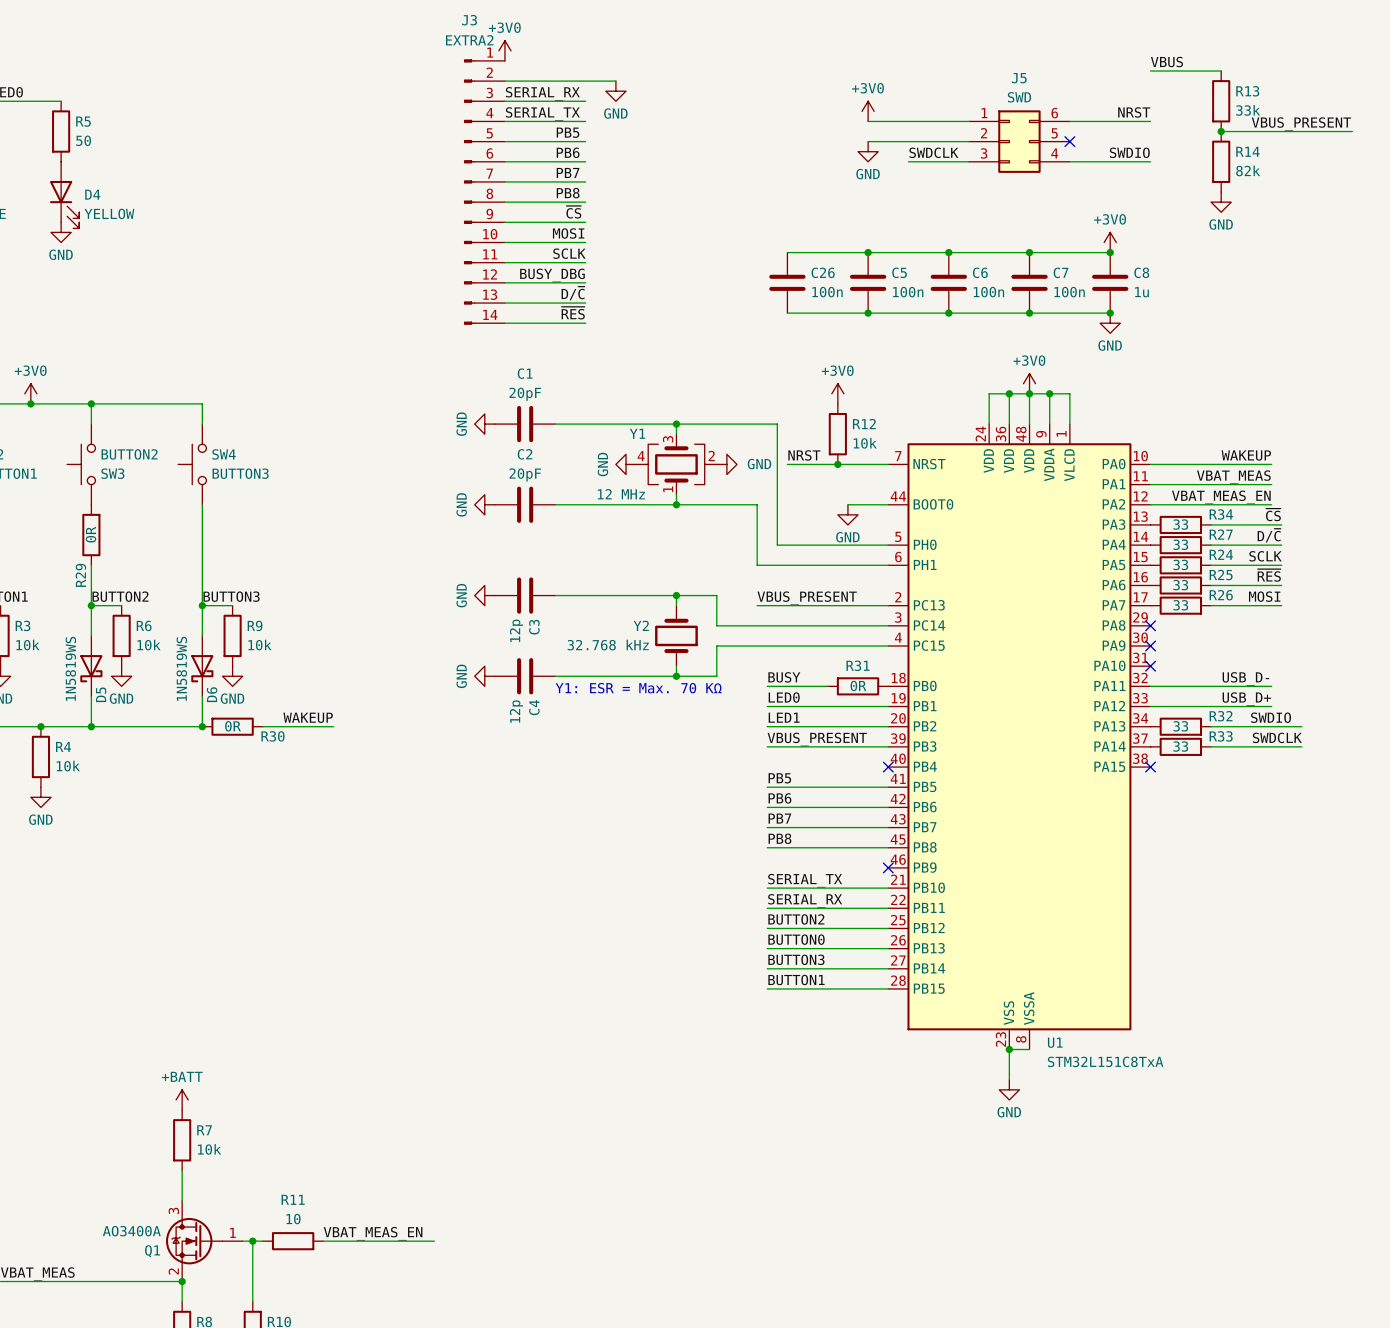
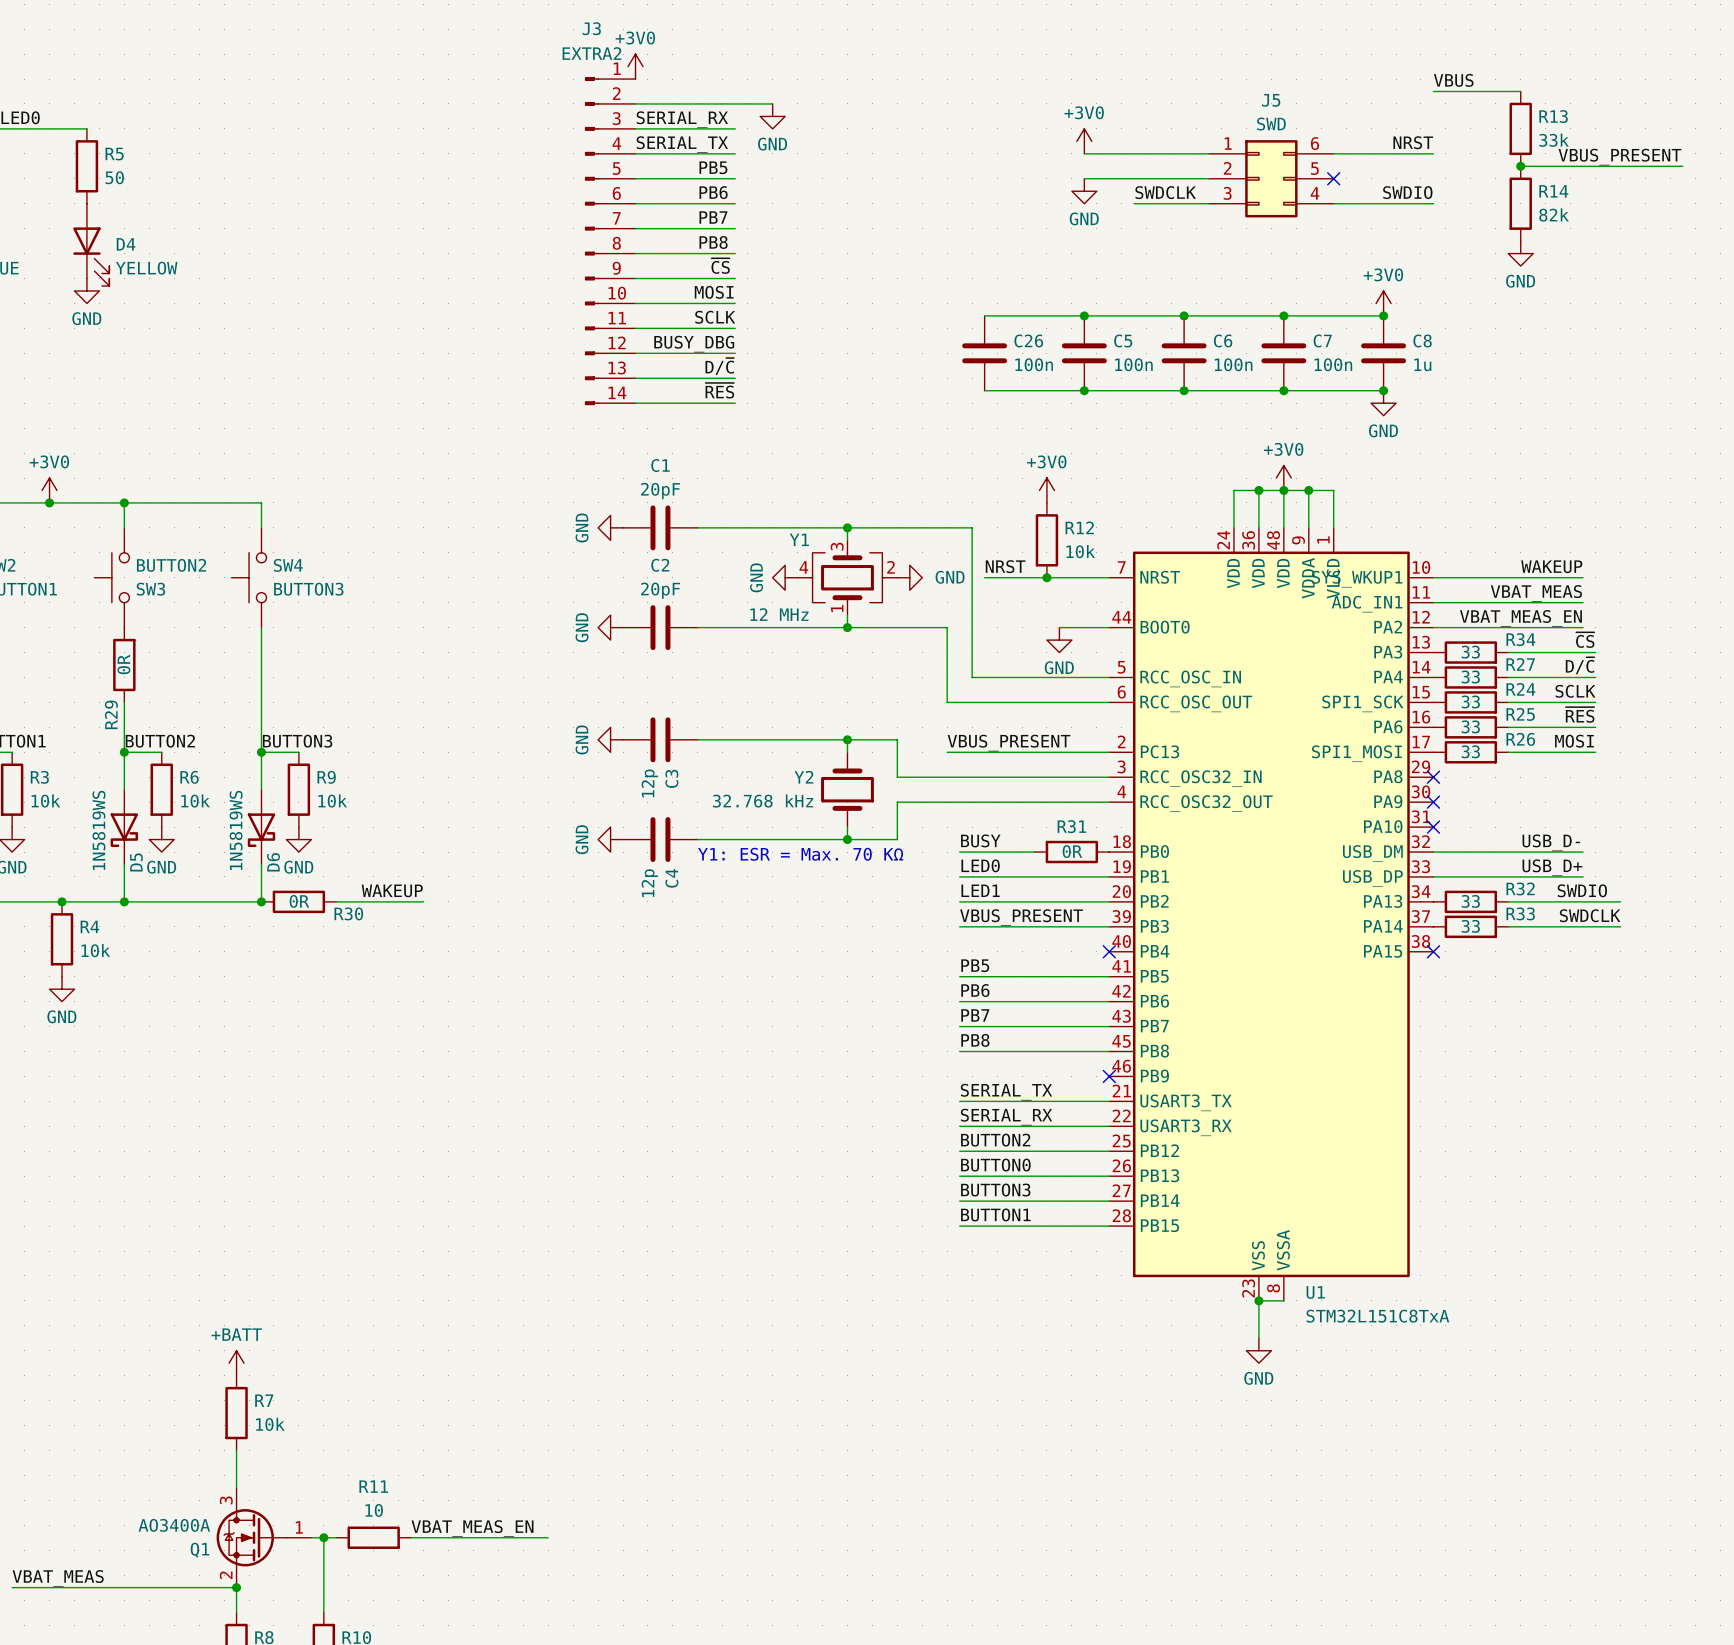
U1 symbol: [888, 424, 1151, 1050] -> [1109, 527, 1434, 1301]

